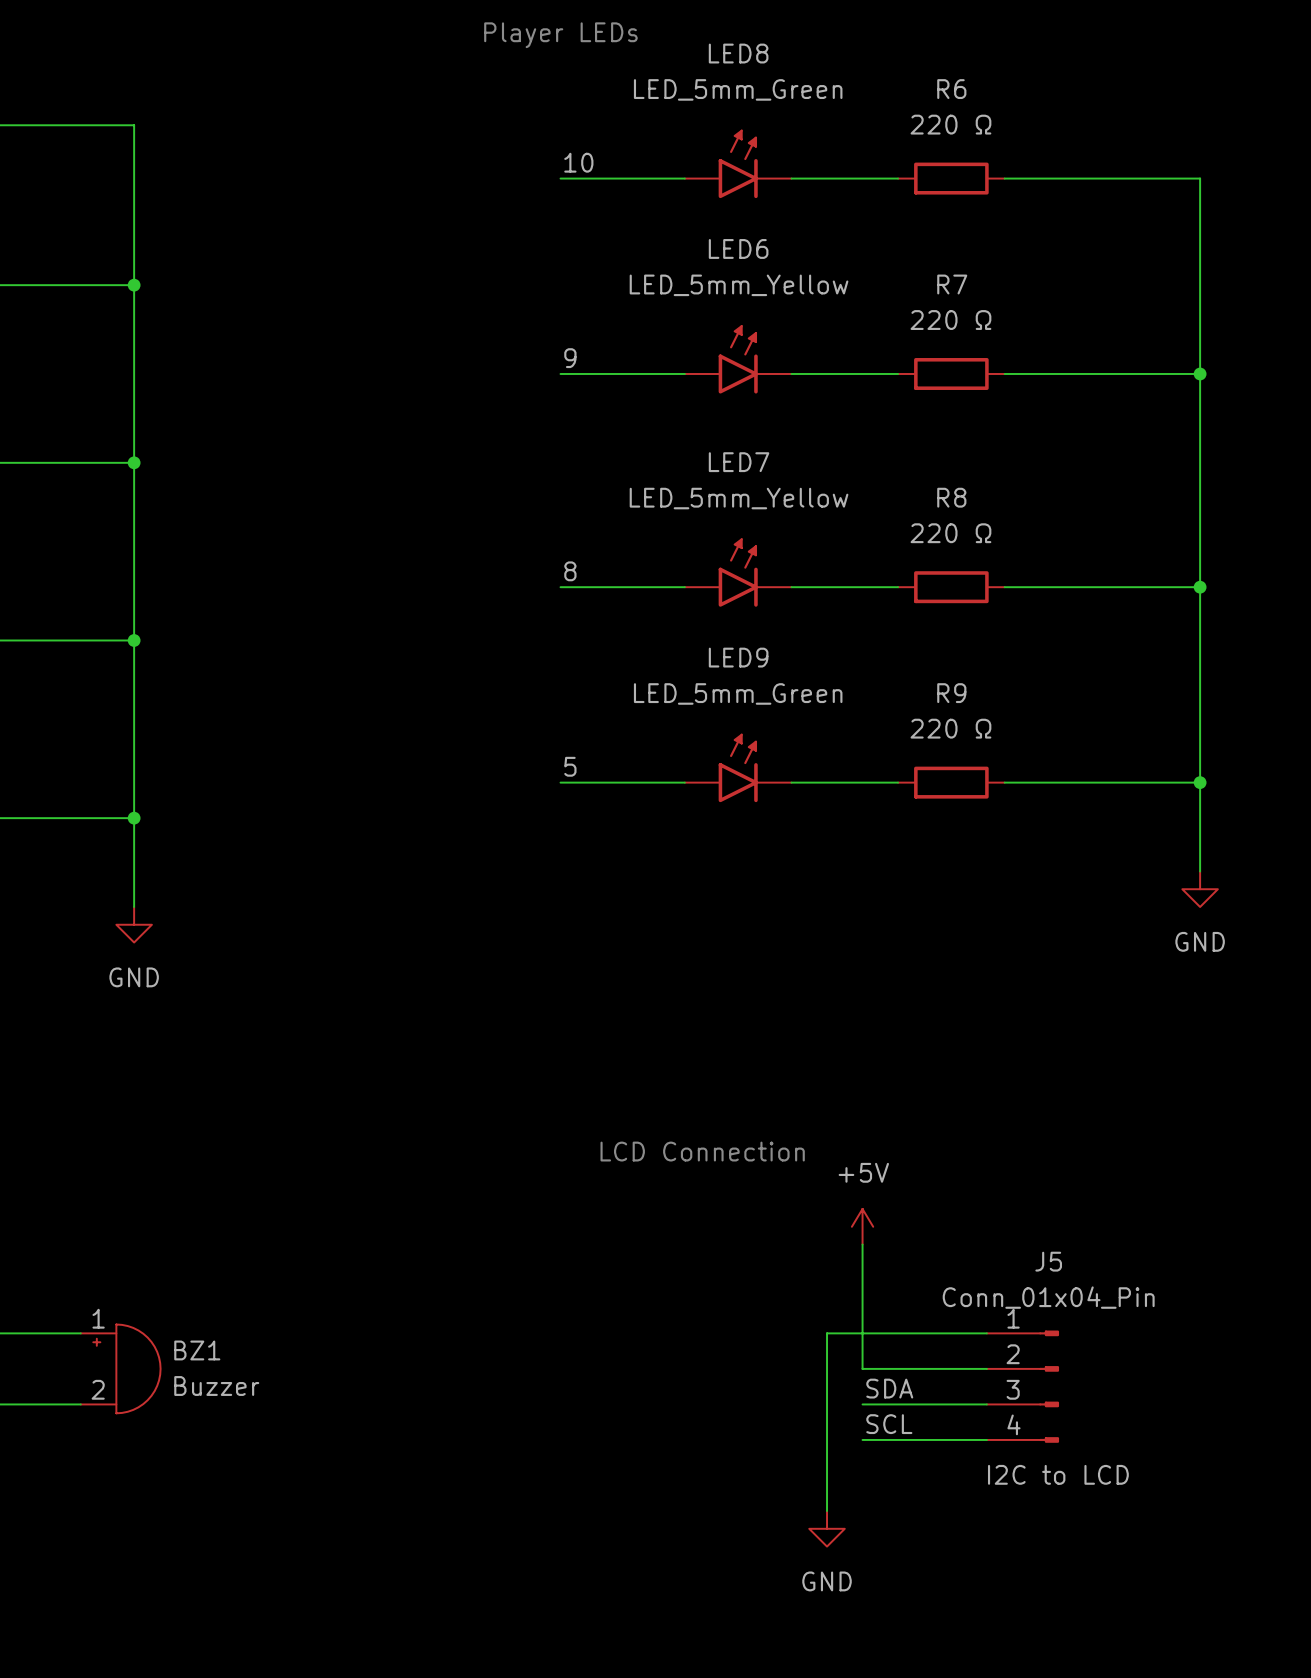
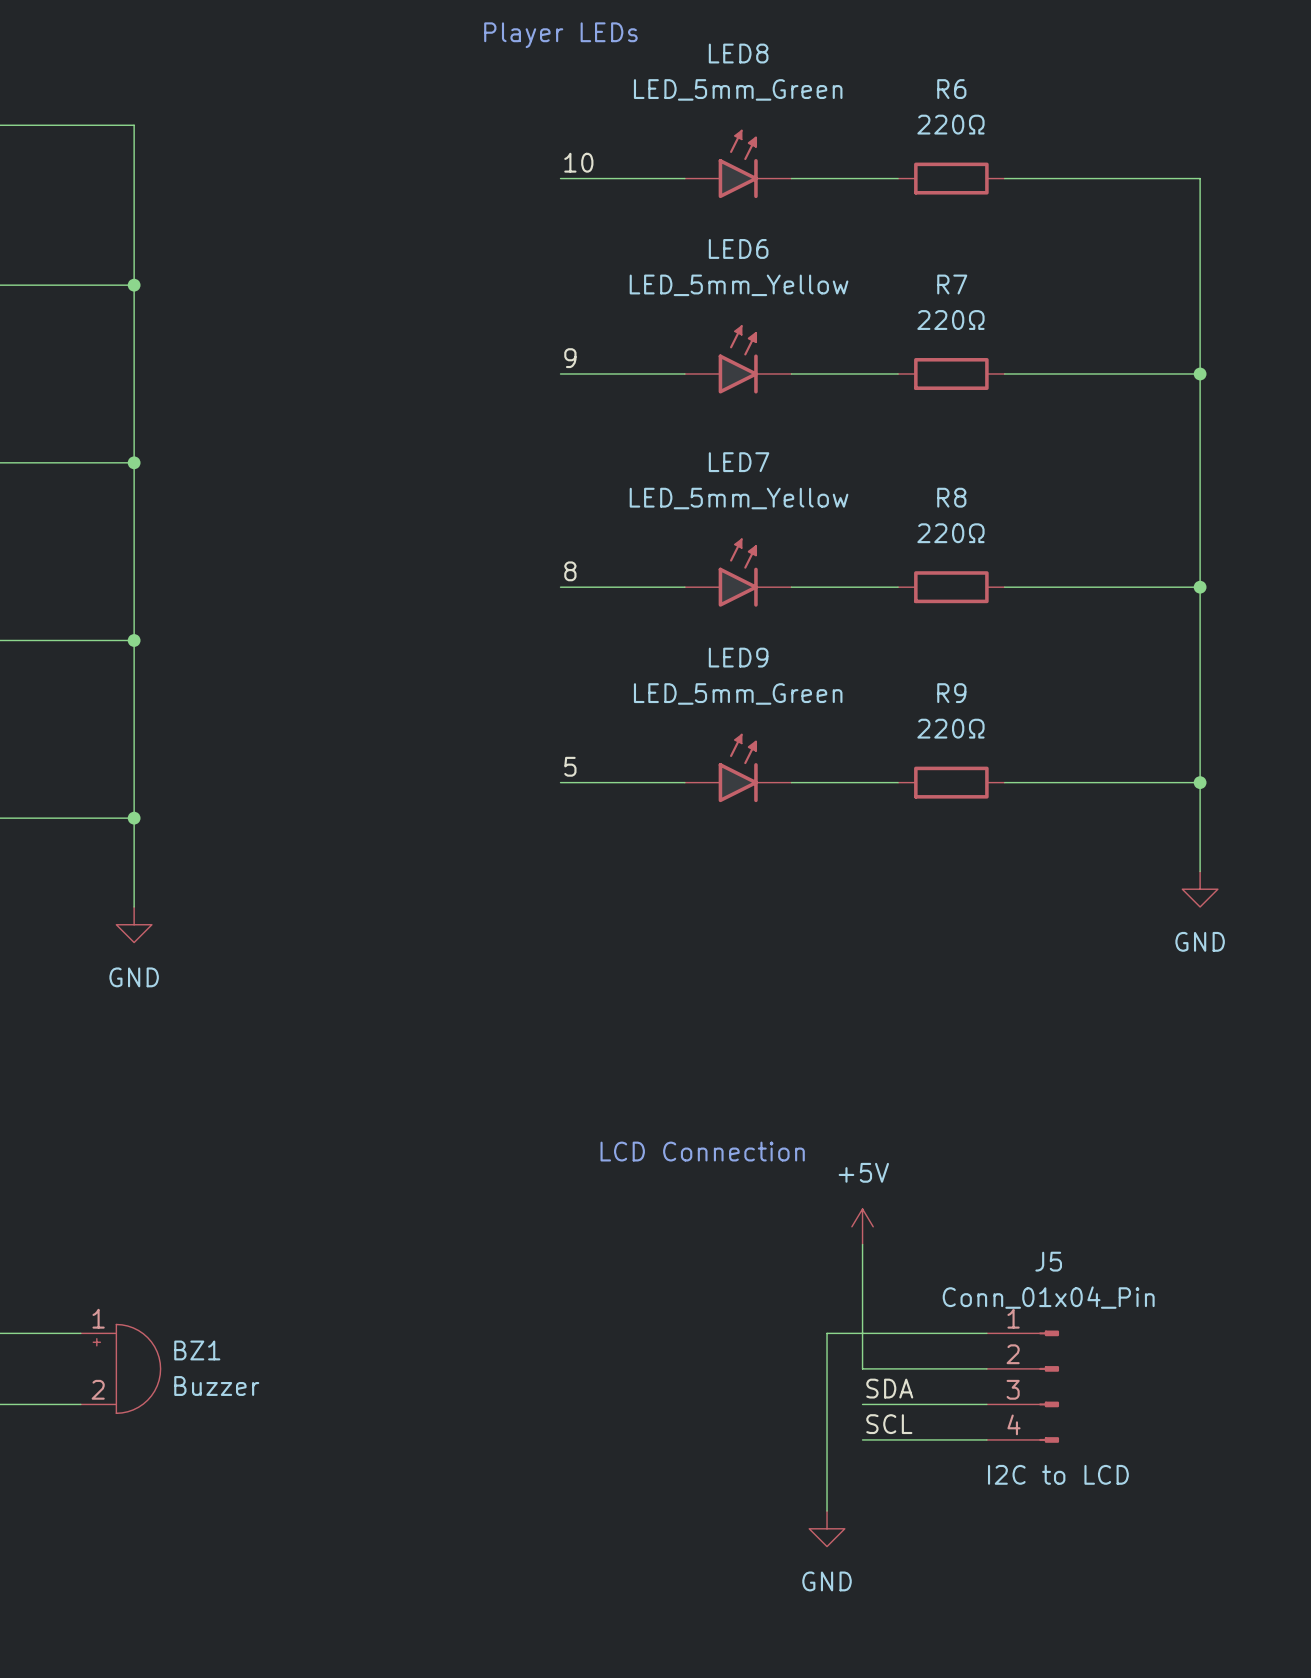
R6 value: 220 Ω (950, 124) -> 220Ω (950, 124)
R7 value: 220 Ω (950, 320) -> 220Ω (950, 320)
R8 value: 220 Ω (950, 533) -> 220Ω (950, 533)
R9 value: 220 Ω (950, 728) -> 220Ω (950, 728)

